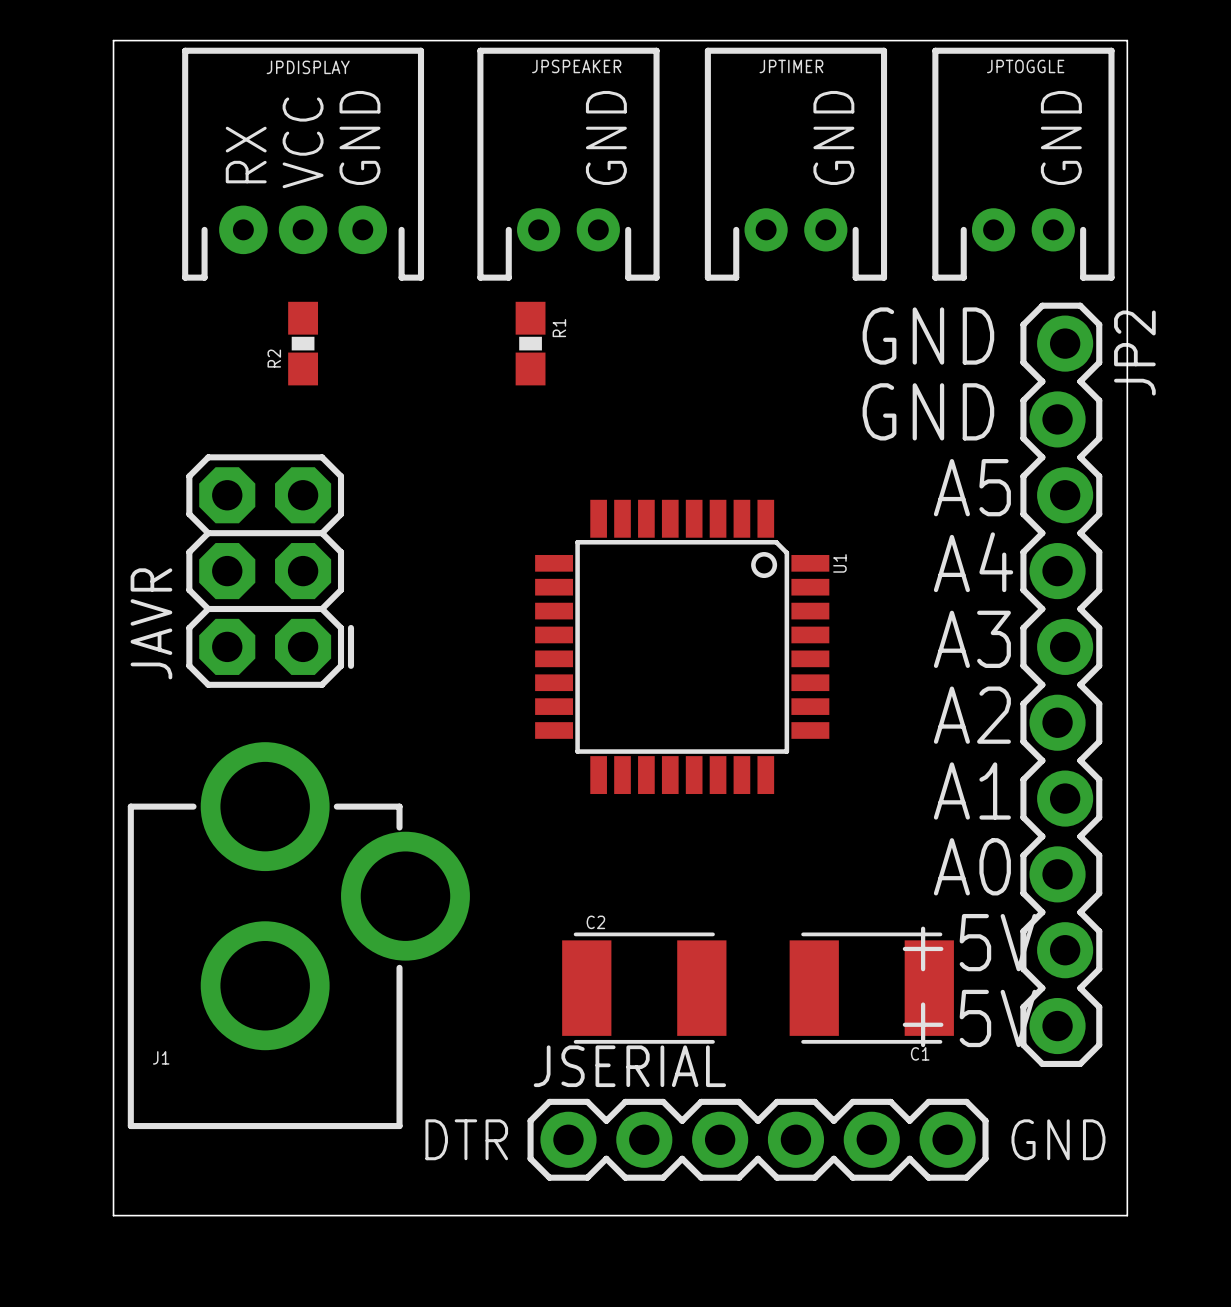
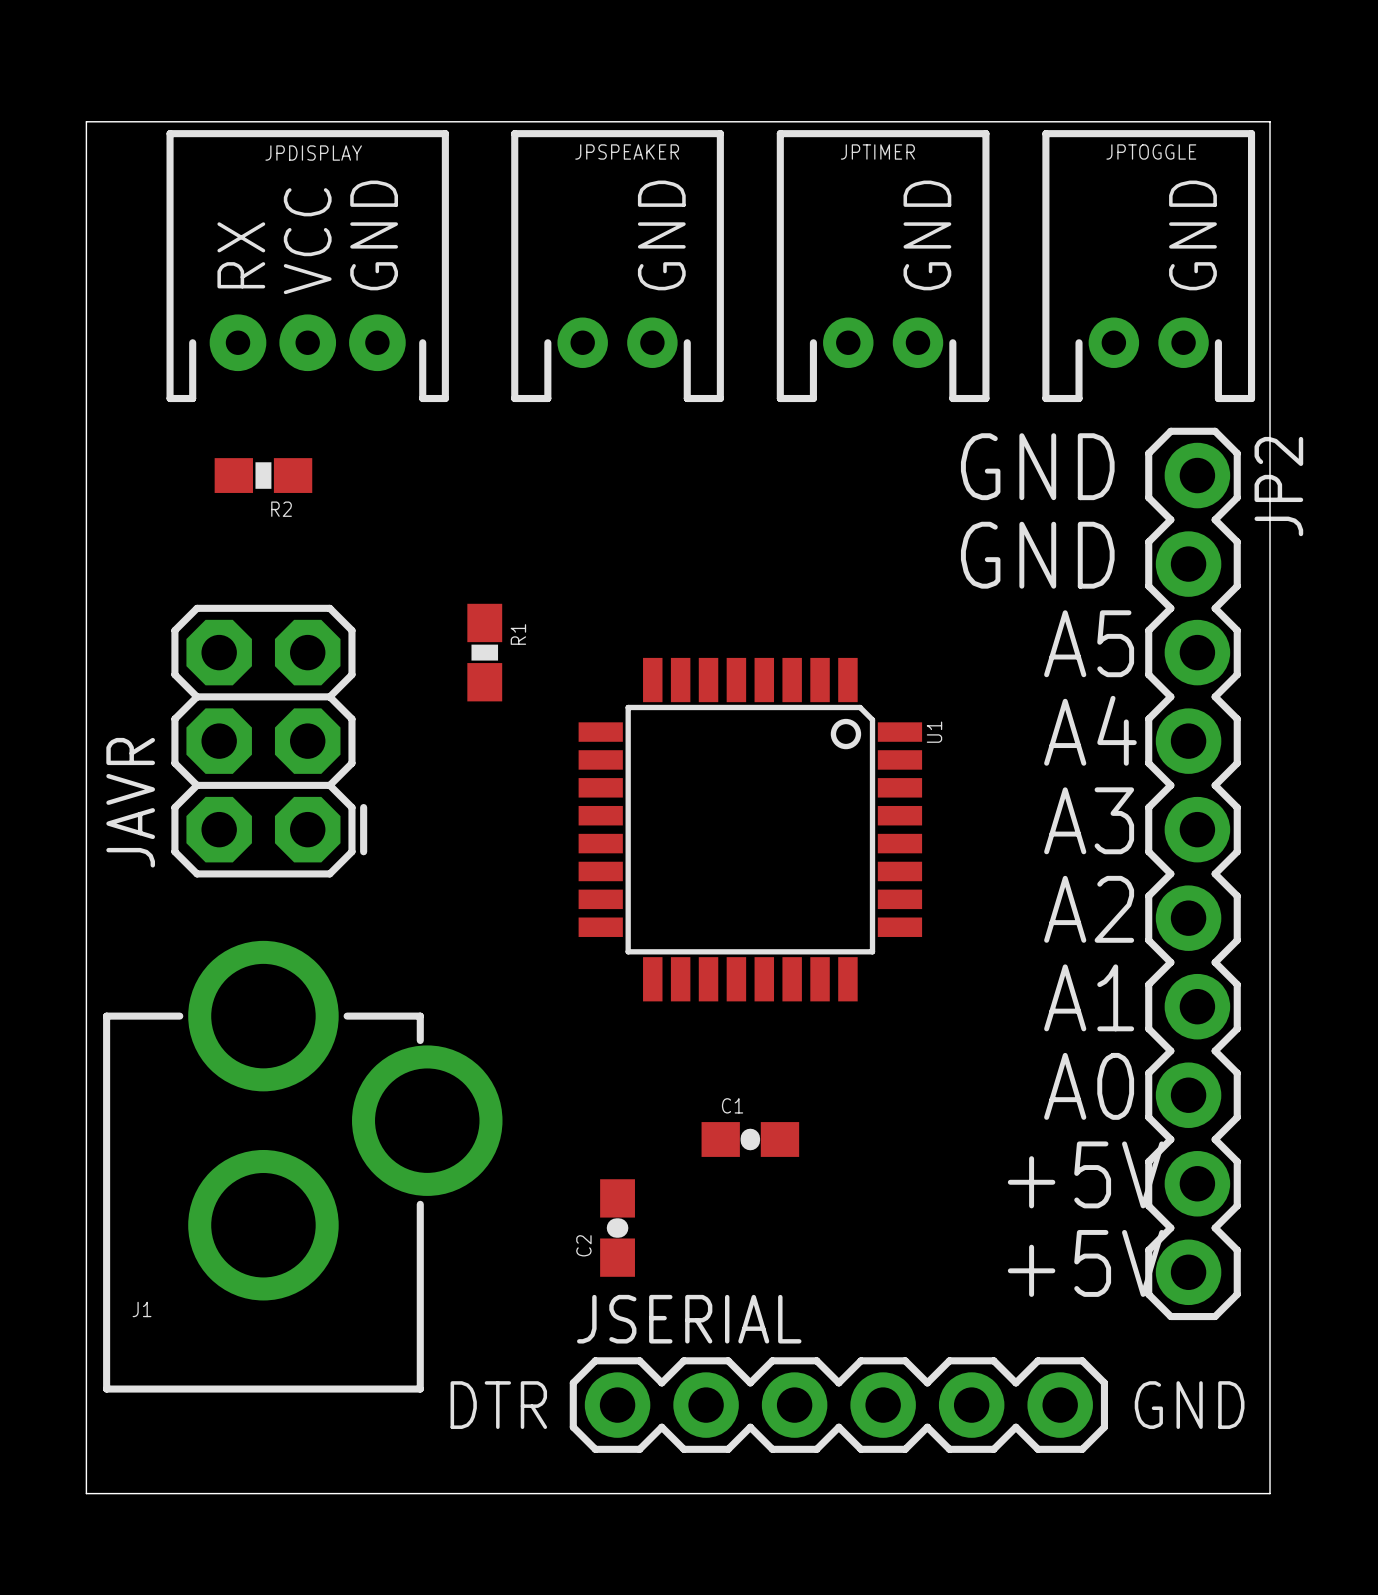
R2 rotation: 0° (303, 343) -> 90° clockwise (263, 475)
R1 position: (530, 343) -> (484, 652)
C2 name position: C2 (595, 922) -> C2 (583, 1245)
C2 footprint: [562, 932, 727, 1044] -> [600, 1179, 635, 1277]
C1 footprint: [789, 932, 954, 1044] -> [701, 1122, 800, 1157]
C1 name position: C1 (920, 1053) -> C1 (732, 1105)

